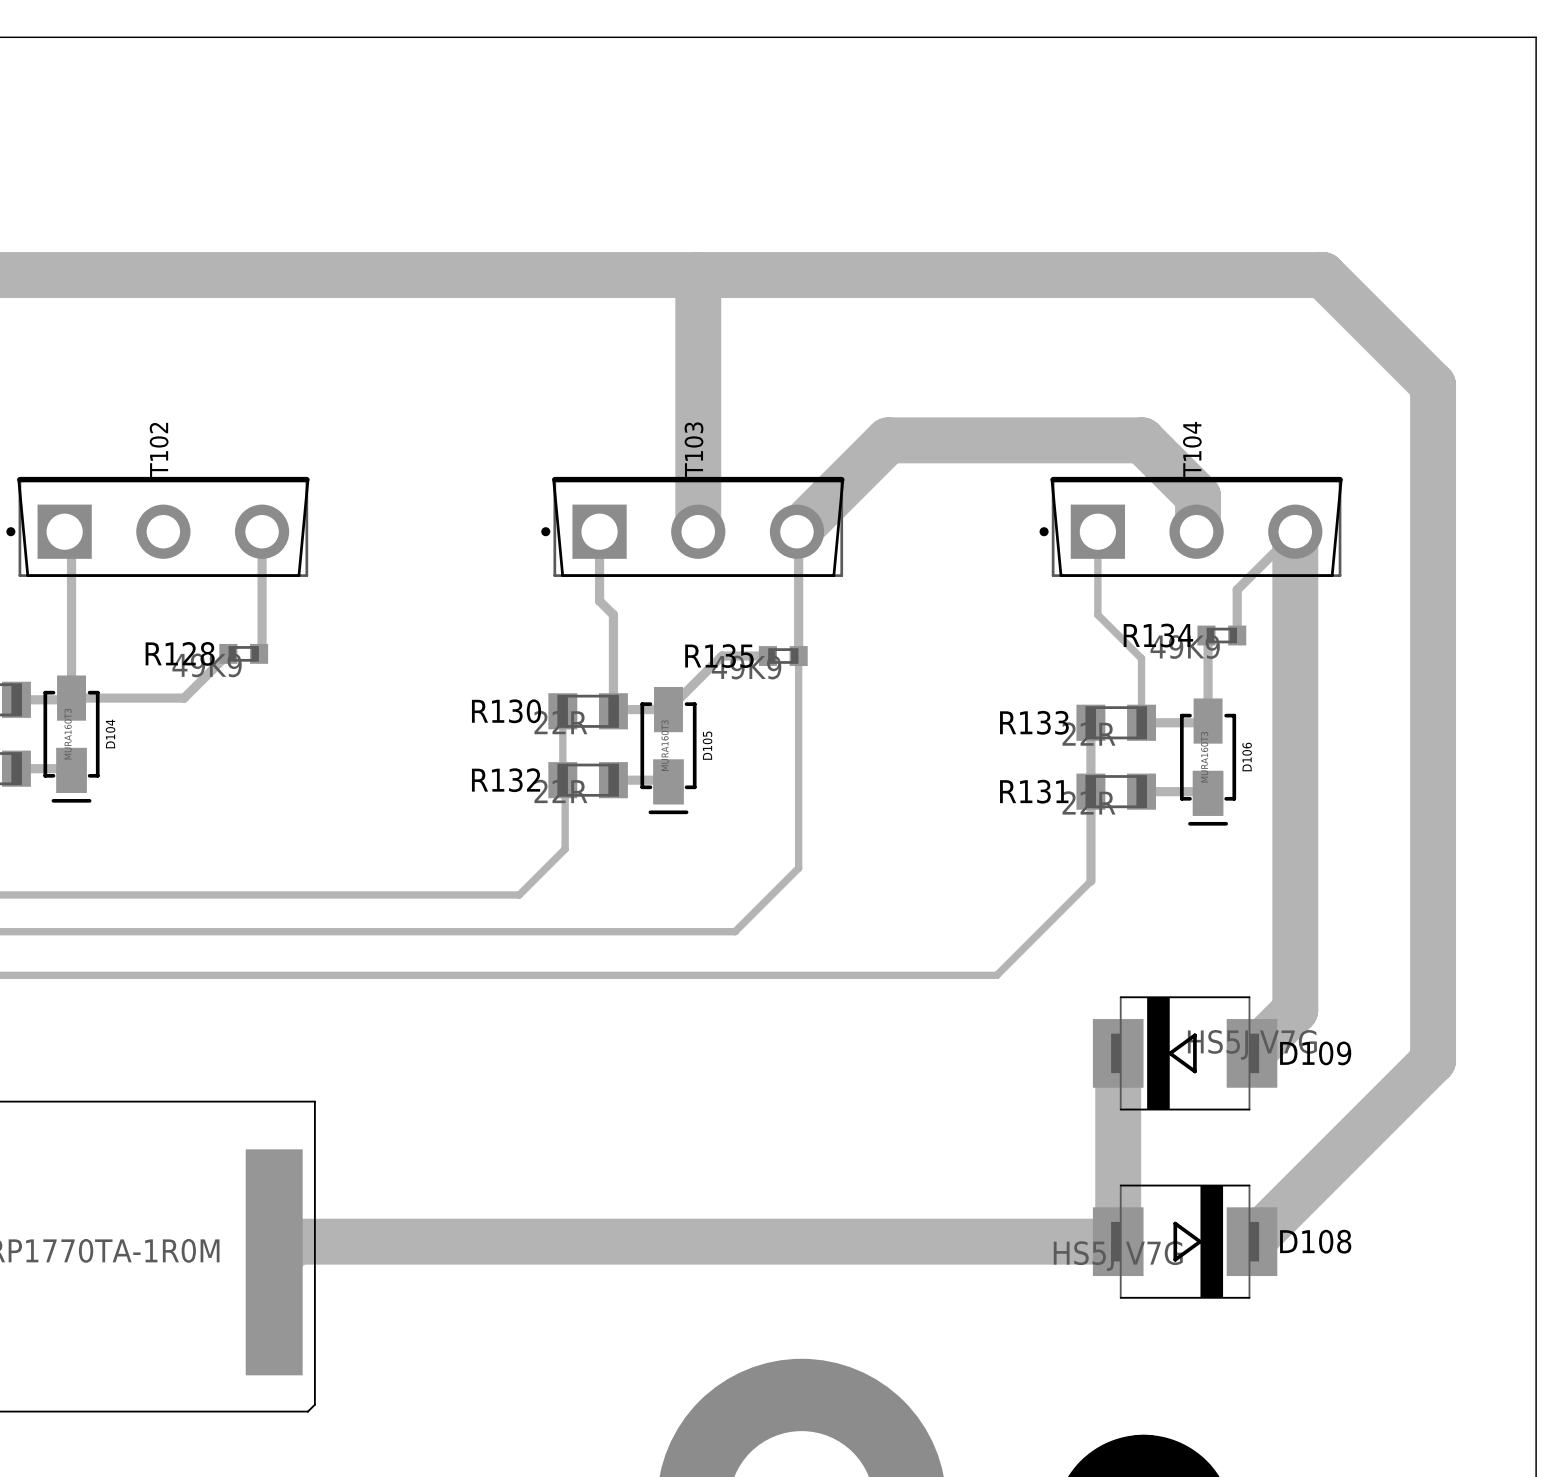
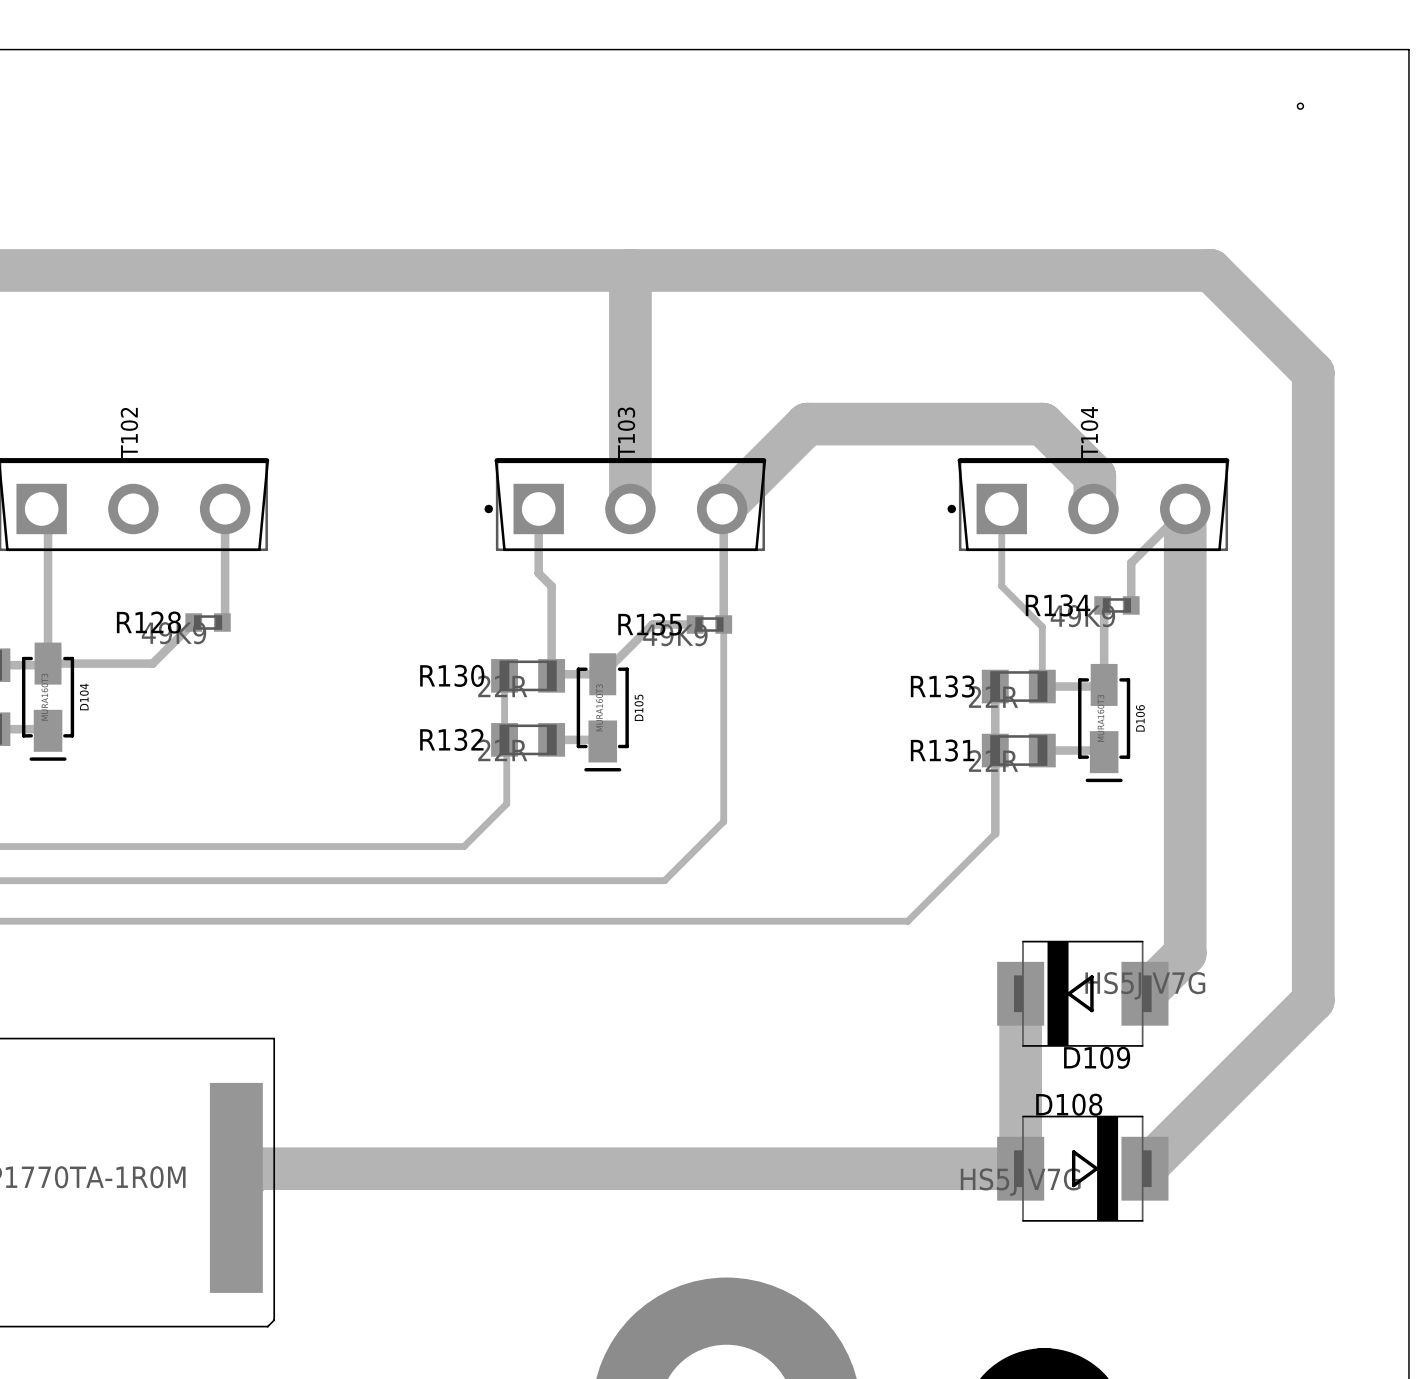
hole: none -> (1300, 106)
D109 name position: D109 (1315, 1053) -> D109 (1097, 1057)
D108 name position: D108 (1315, 1241) -> D108 (1069, 1104)

